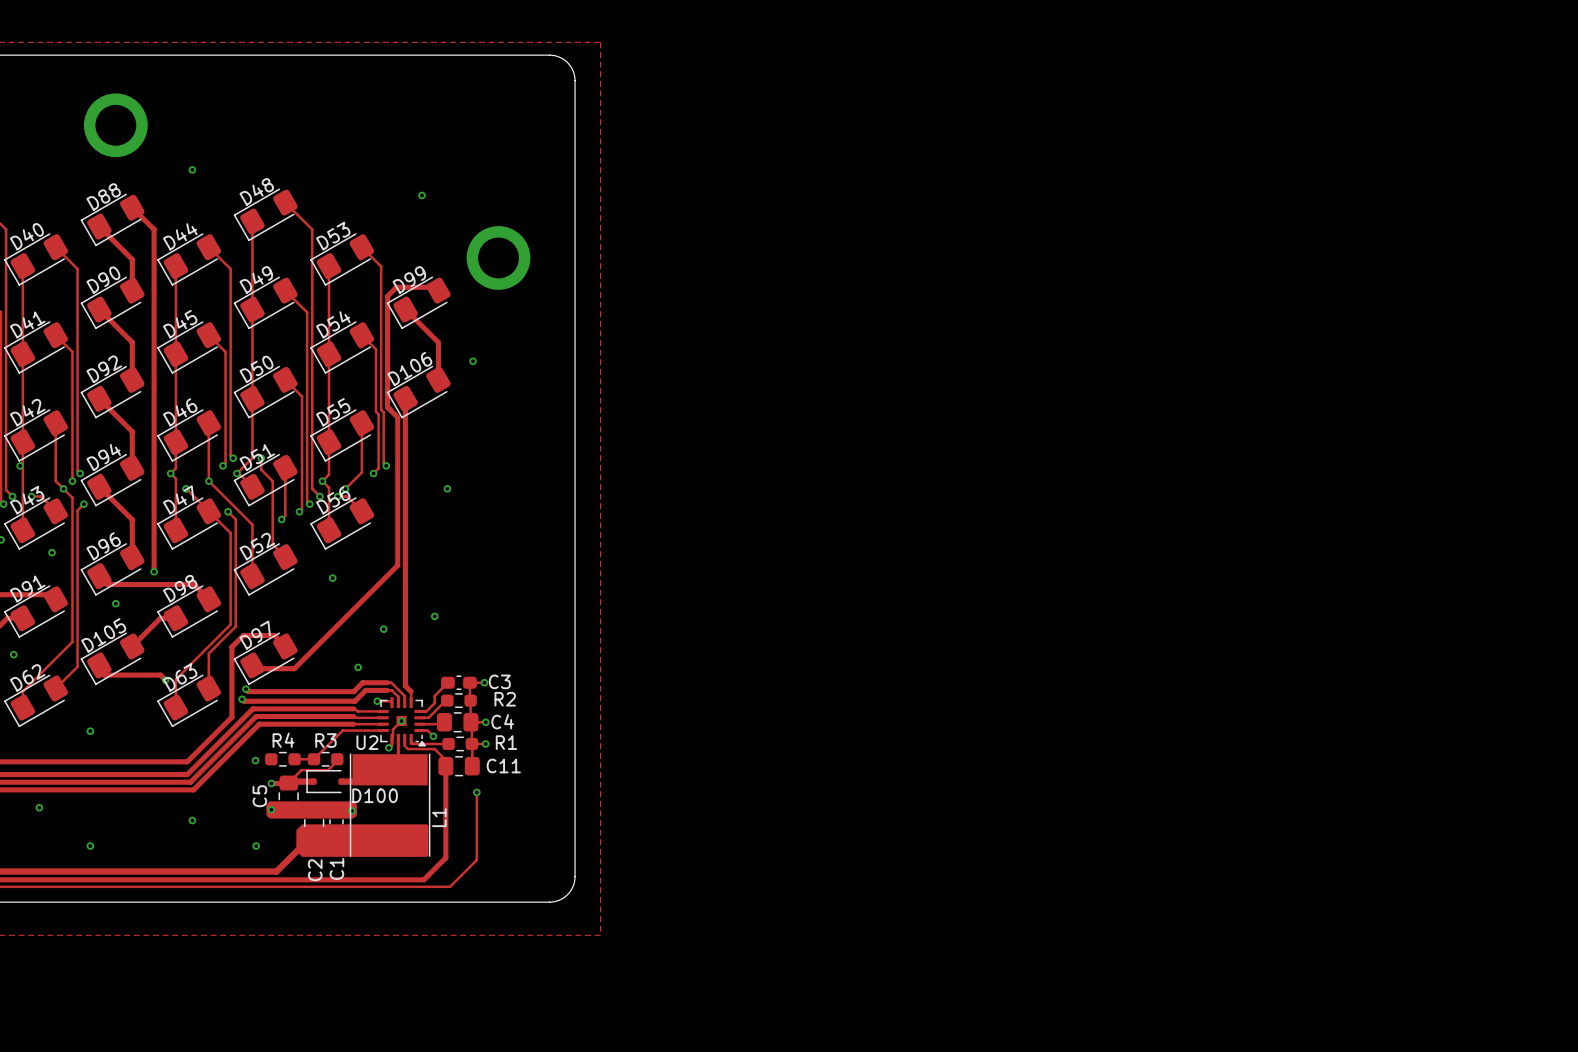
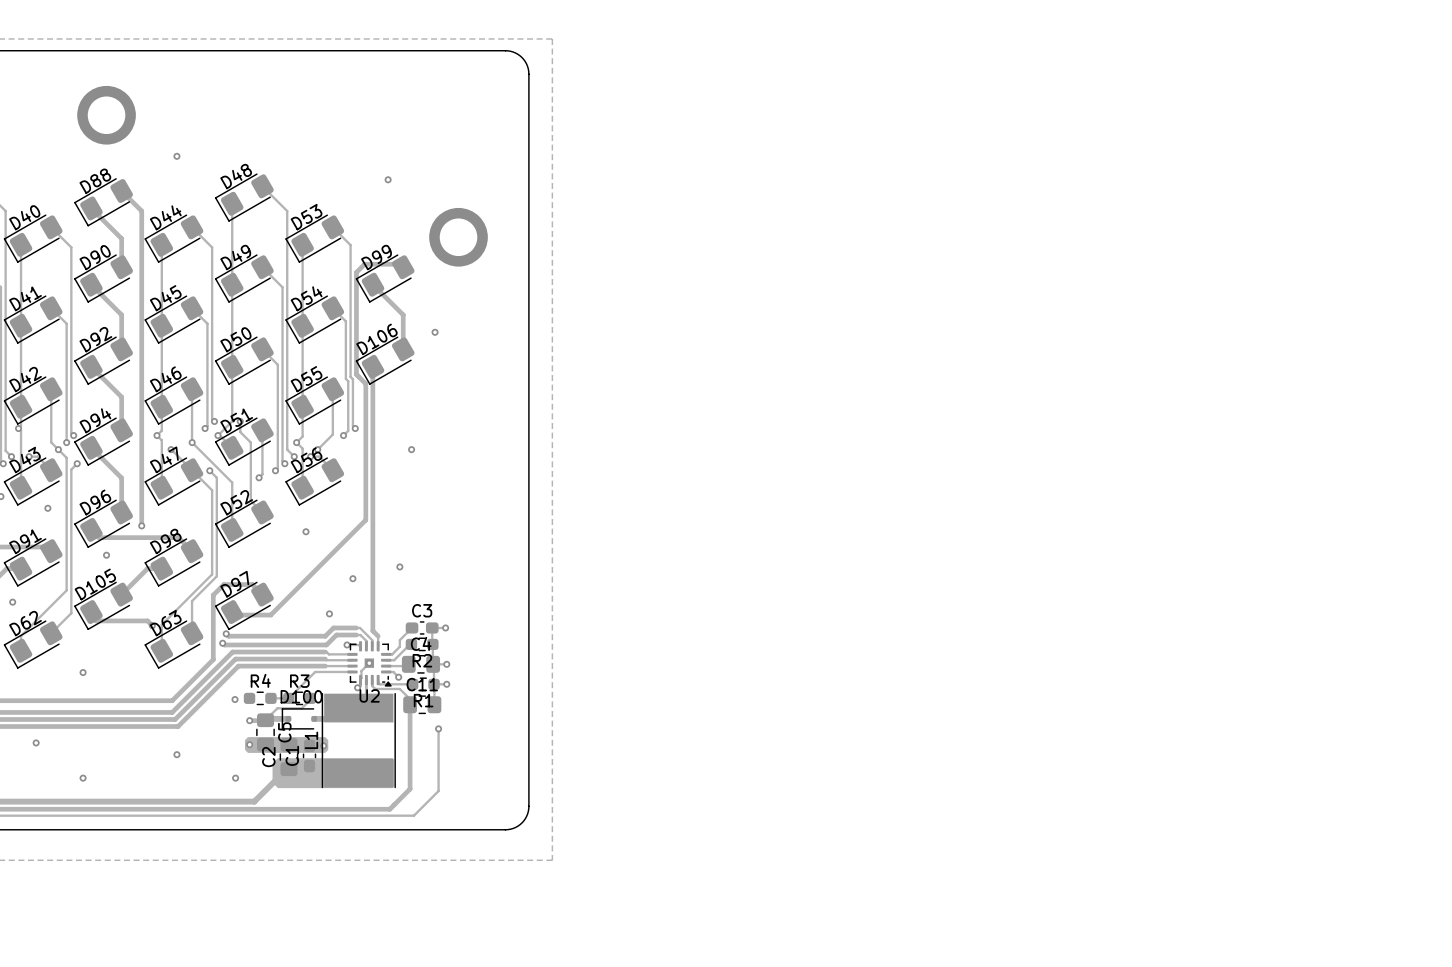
C3 name position: C3 (499, 681) -> C3 (422, 610)
R2 name position: R2 (505, 699) -> R2 (422, 660)
C4 name position: C4 (502, 721) -> C4 (421, 643)
U2 name position: U2 (367, 742) -> U2 (369, 695)
R1 name position: R1 (506, 742) -> R1 (423, 700)
C11 name position: C11 (503, 766) -> C11 (422, 684)
D100 name position: D100 (375, 795) -> D100 (301, 696)
C5 name position: C5 (259, 796) -> C5 (284, 732)
L1 name position: L1 (439, 817) -> L1 (311, 740)
C1 name position: C1 (336, 868) -> C1 (292, 755)
C2 name position: C2 (315, 870) -> C2 (268, 757)

